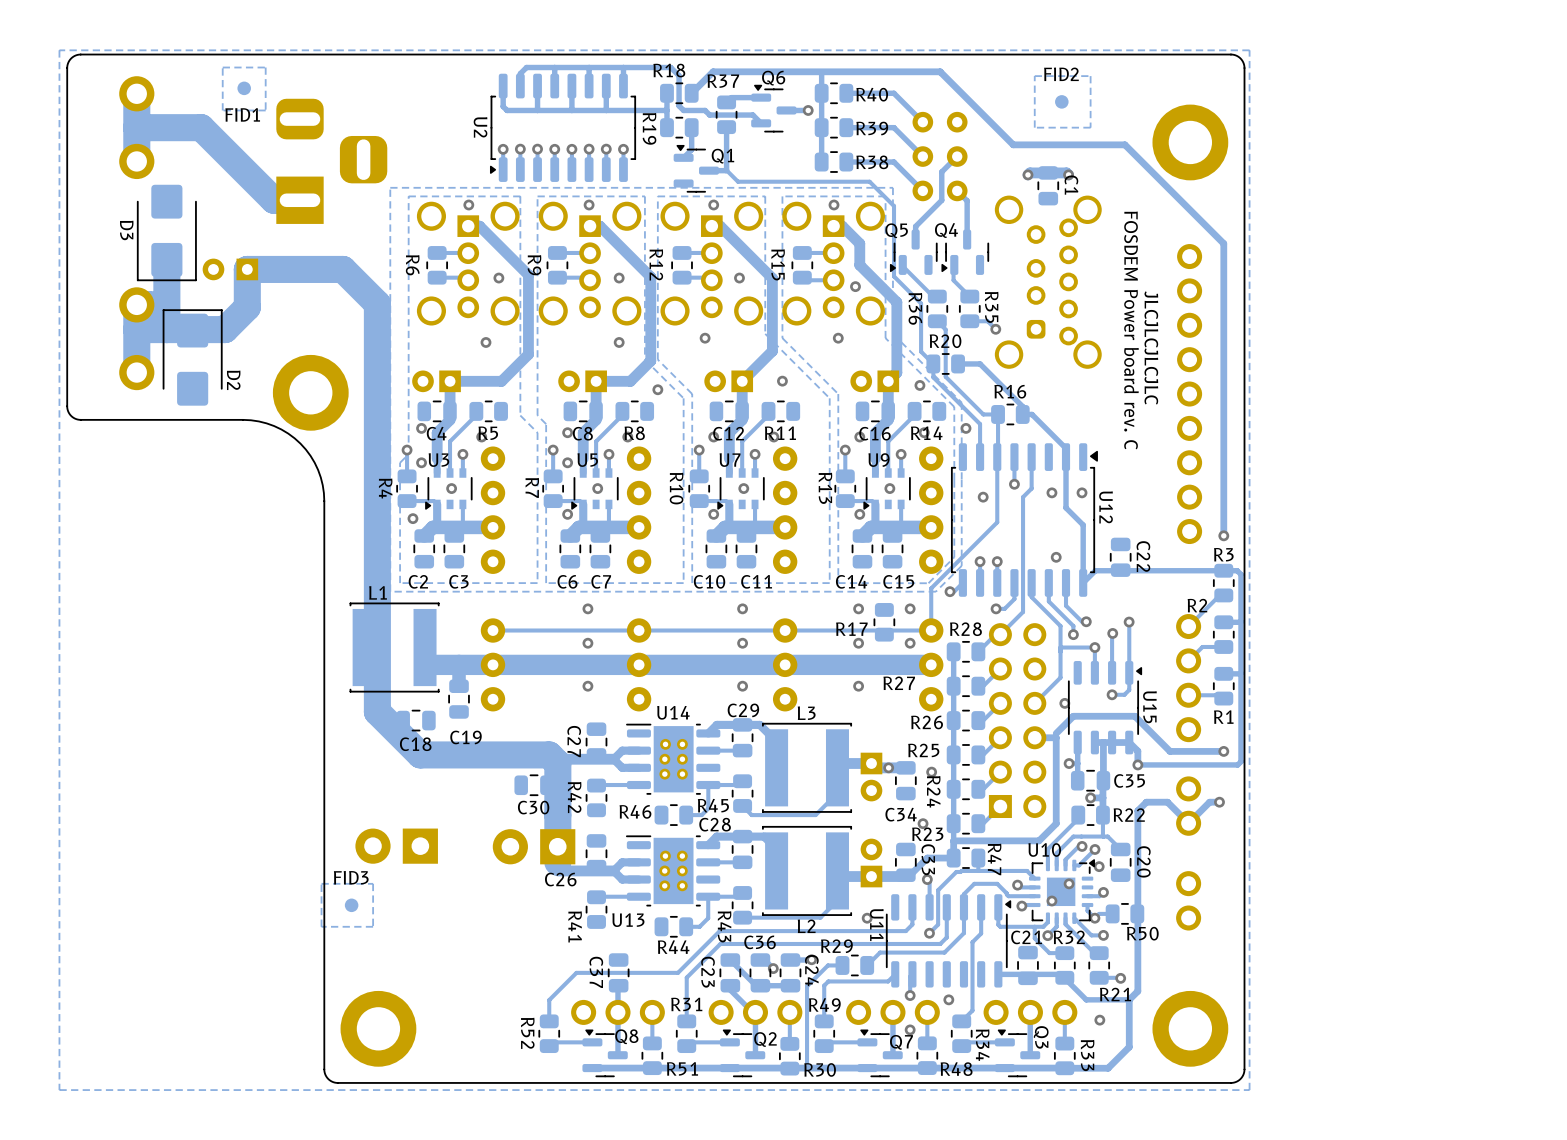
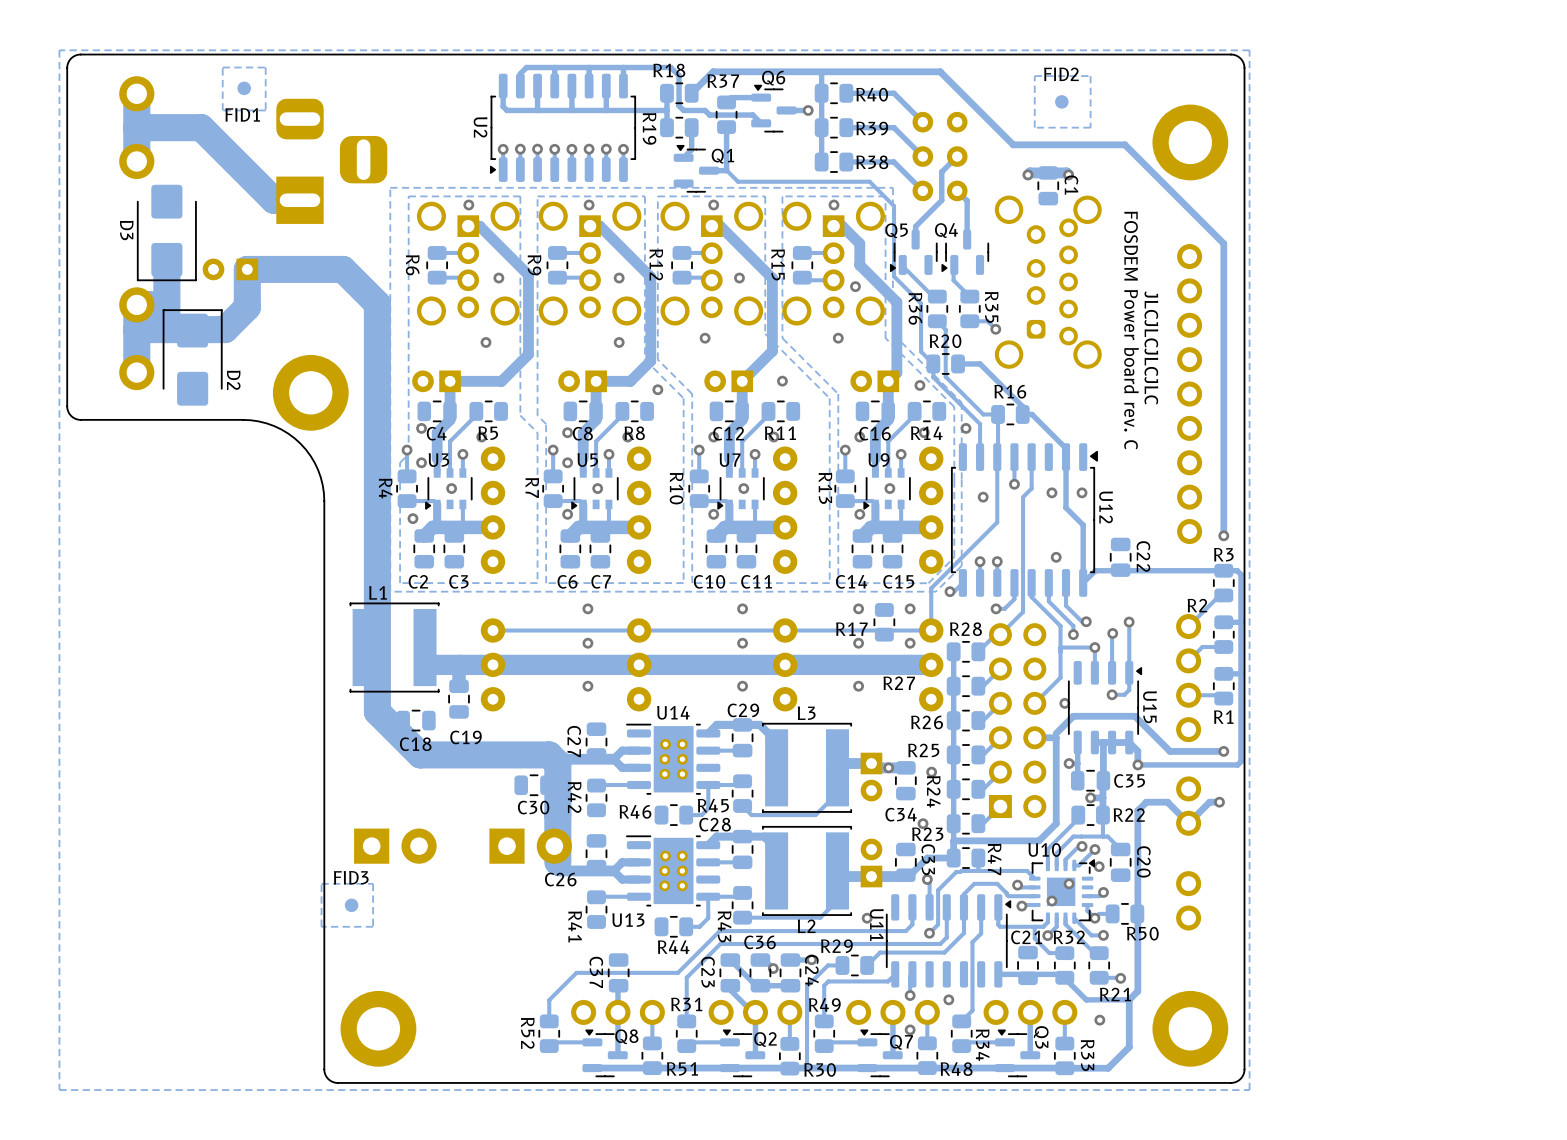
part rotation: 0° (396, 846) -> 180° (395, 846)
part rotation: 0° (534, 846) -> 180° (530, 846)

